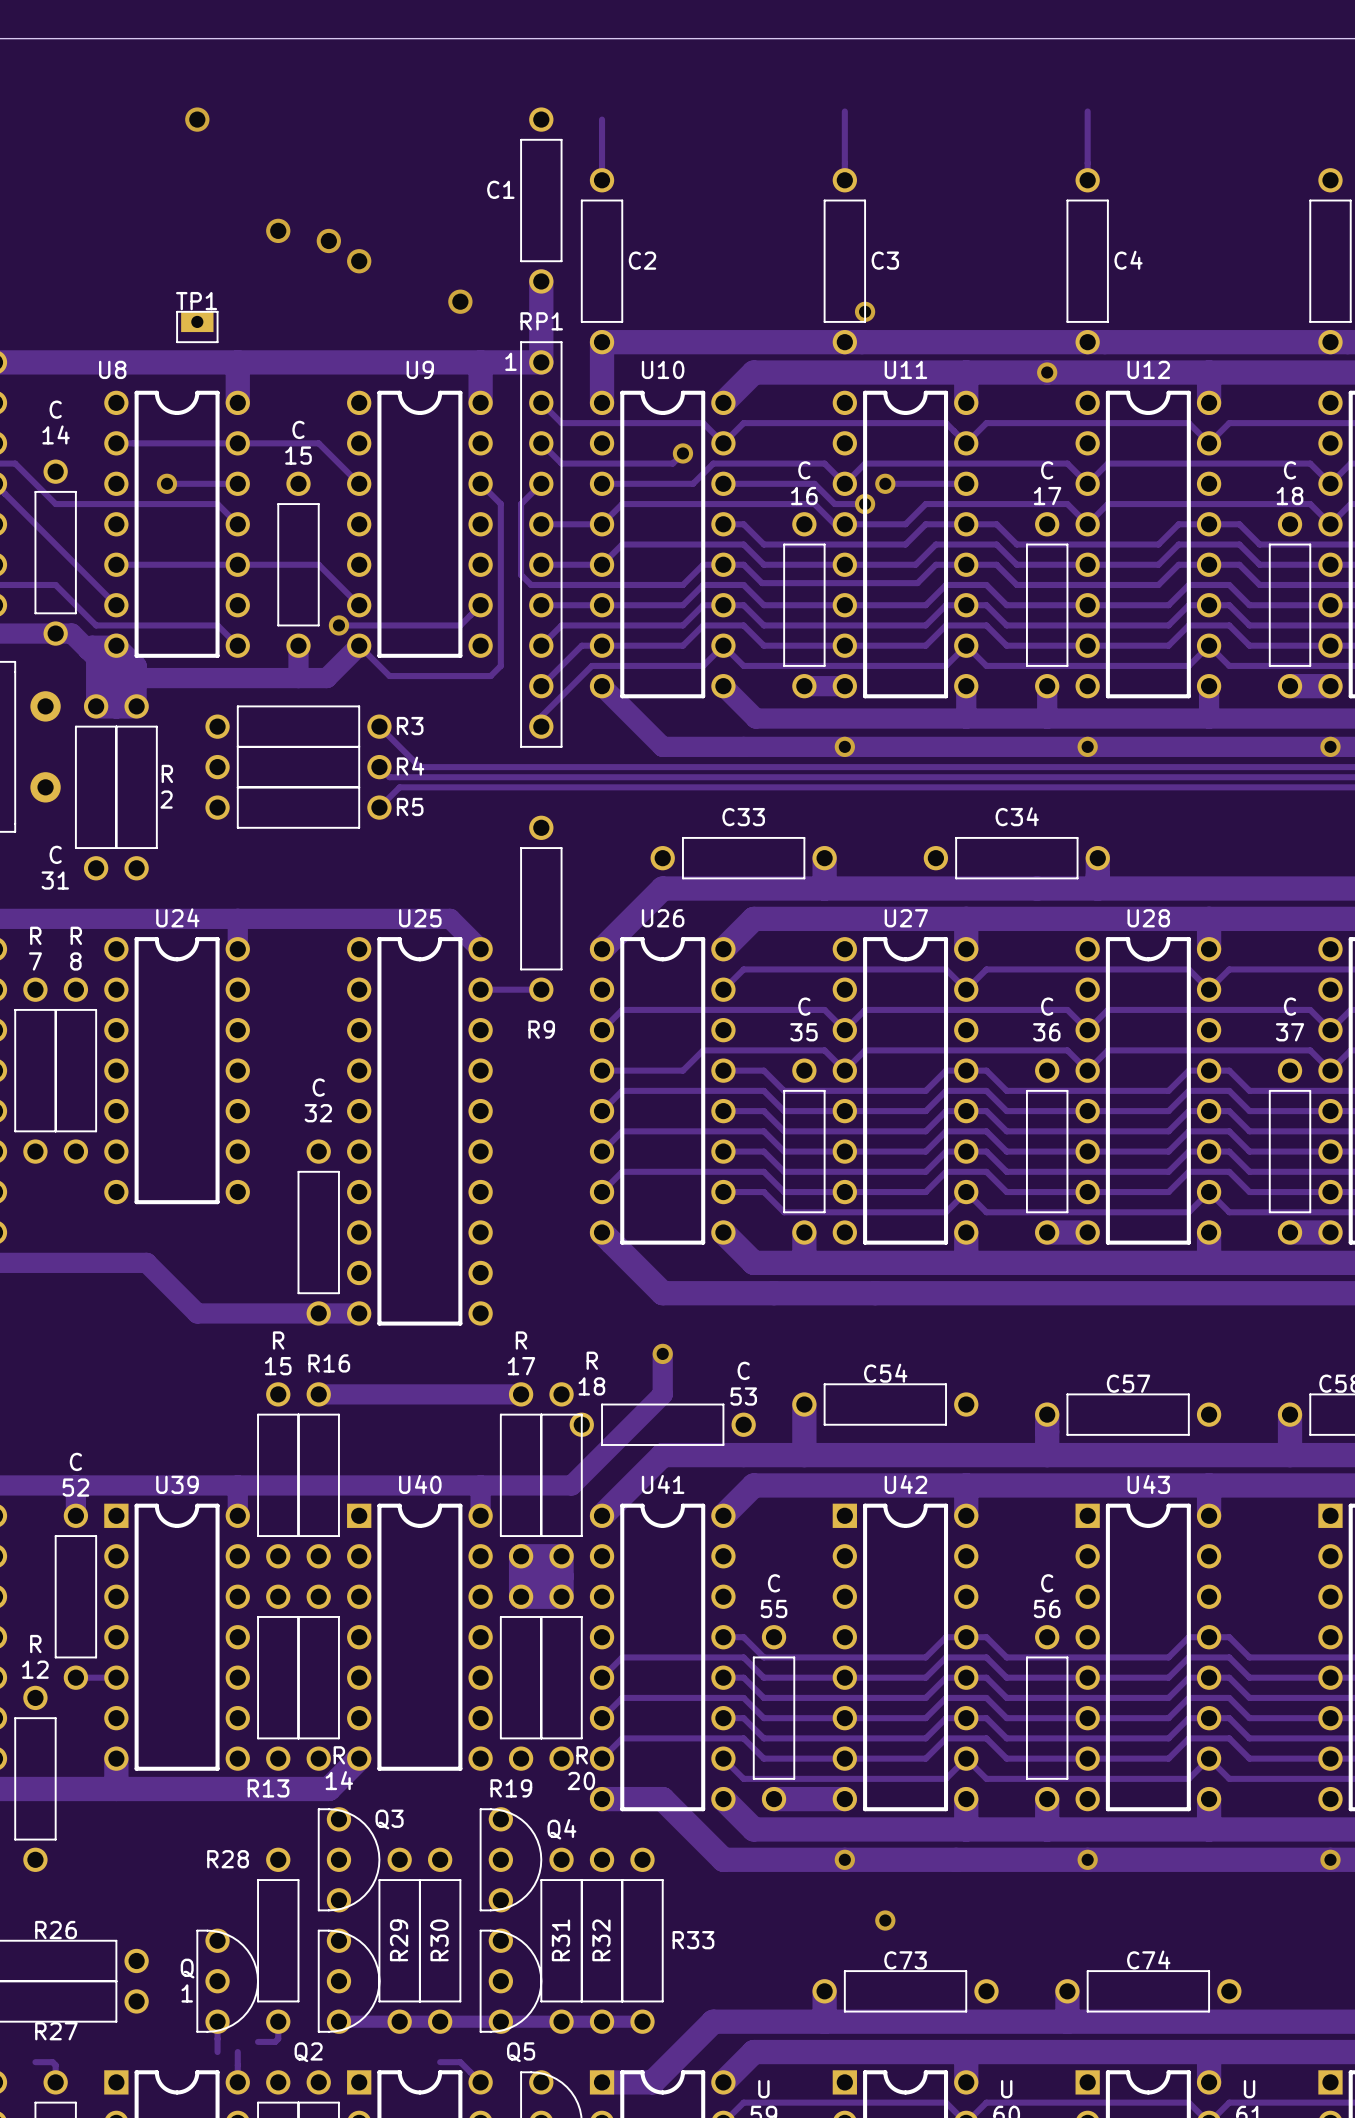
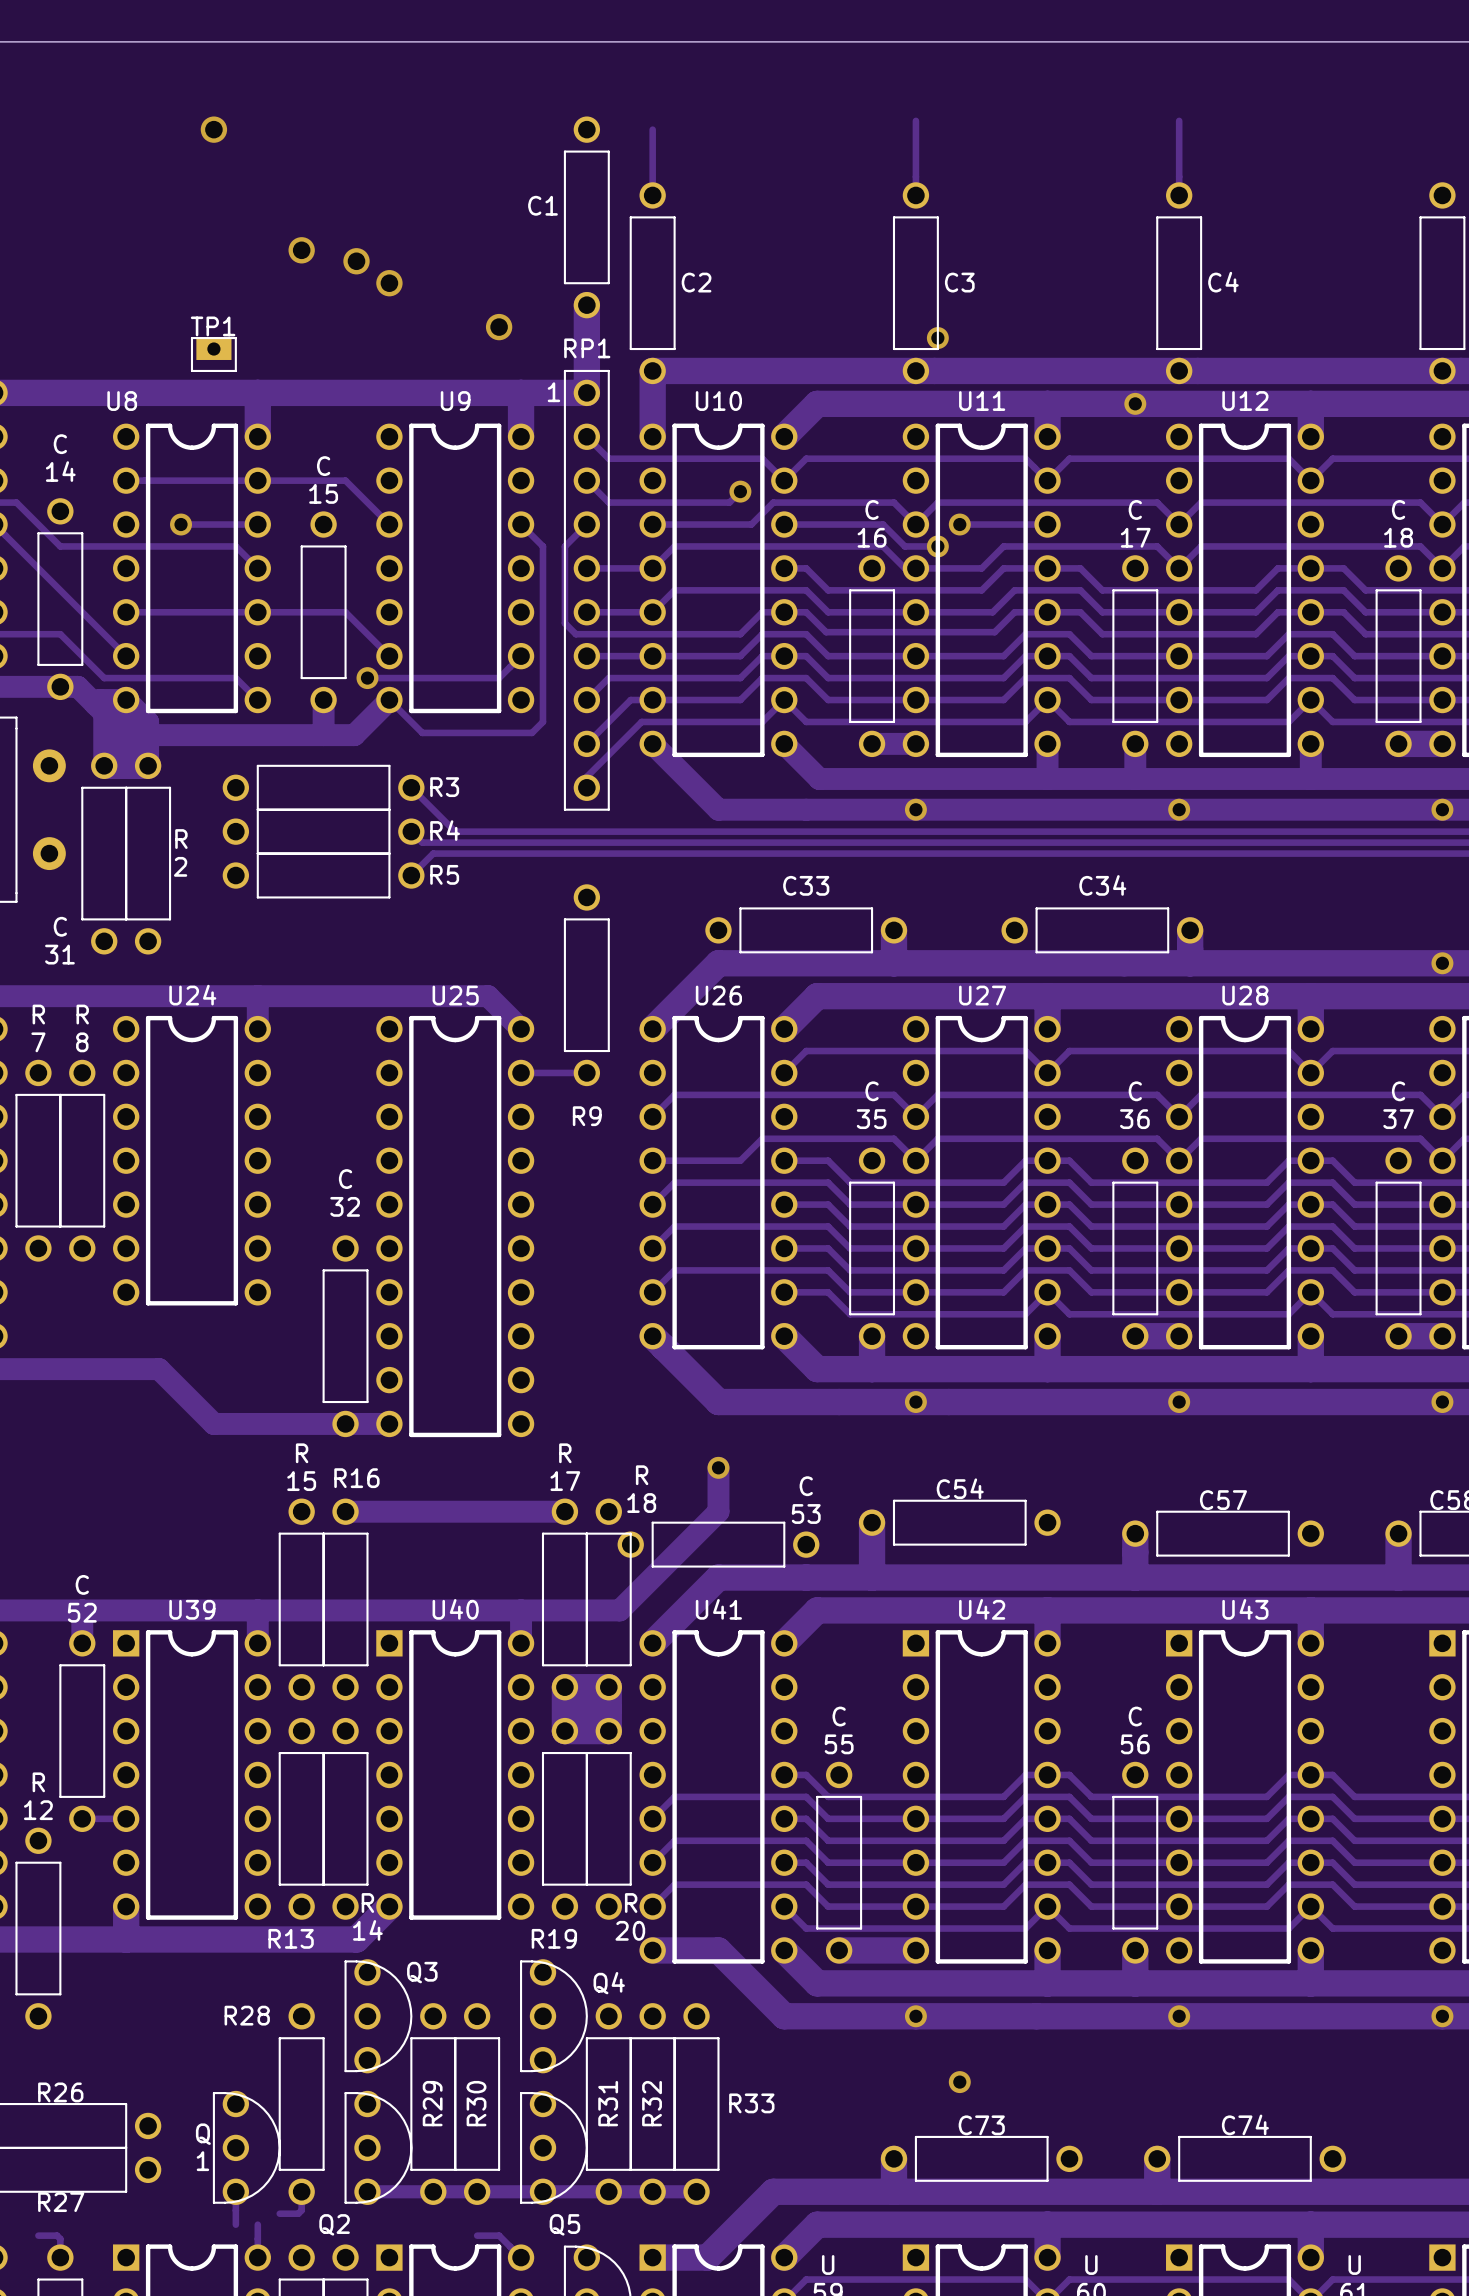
via: none -> (1442, 963)
via: none -> (915, 1402)
via: none -> (1179, 1402)
via: none -> (1442, 1402)

